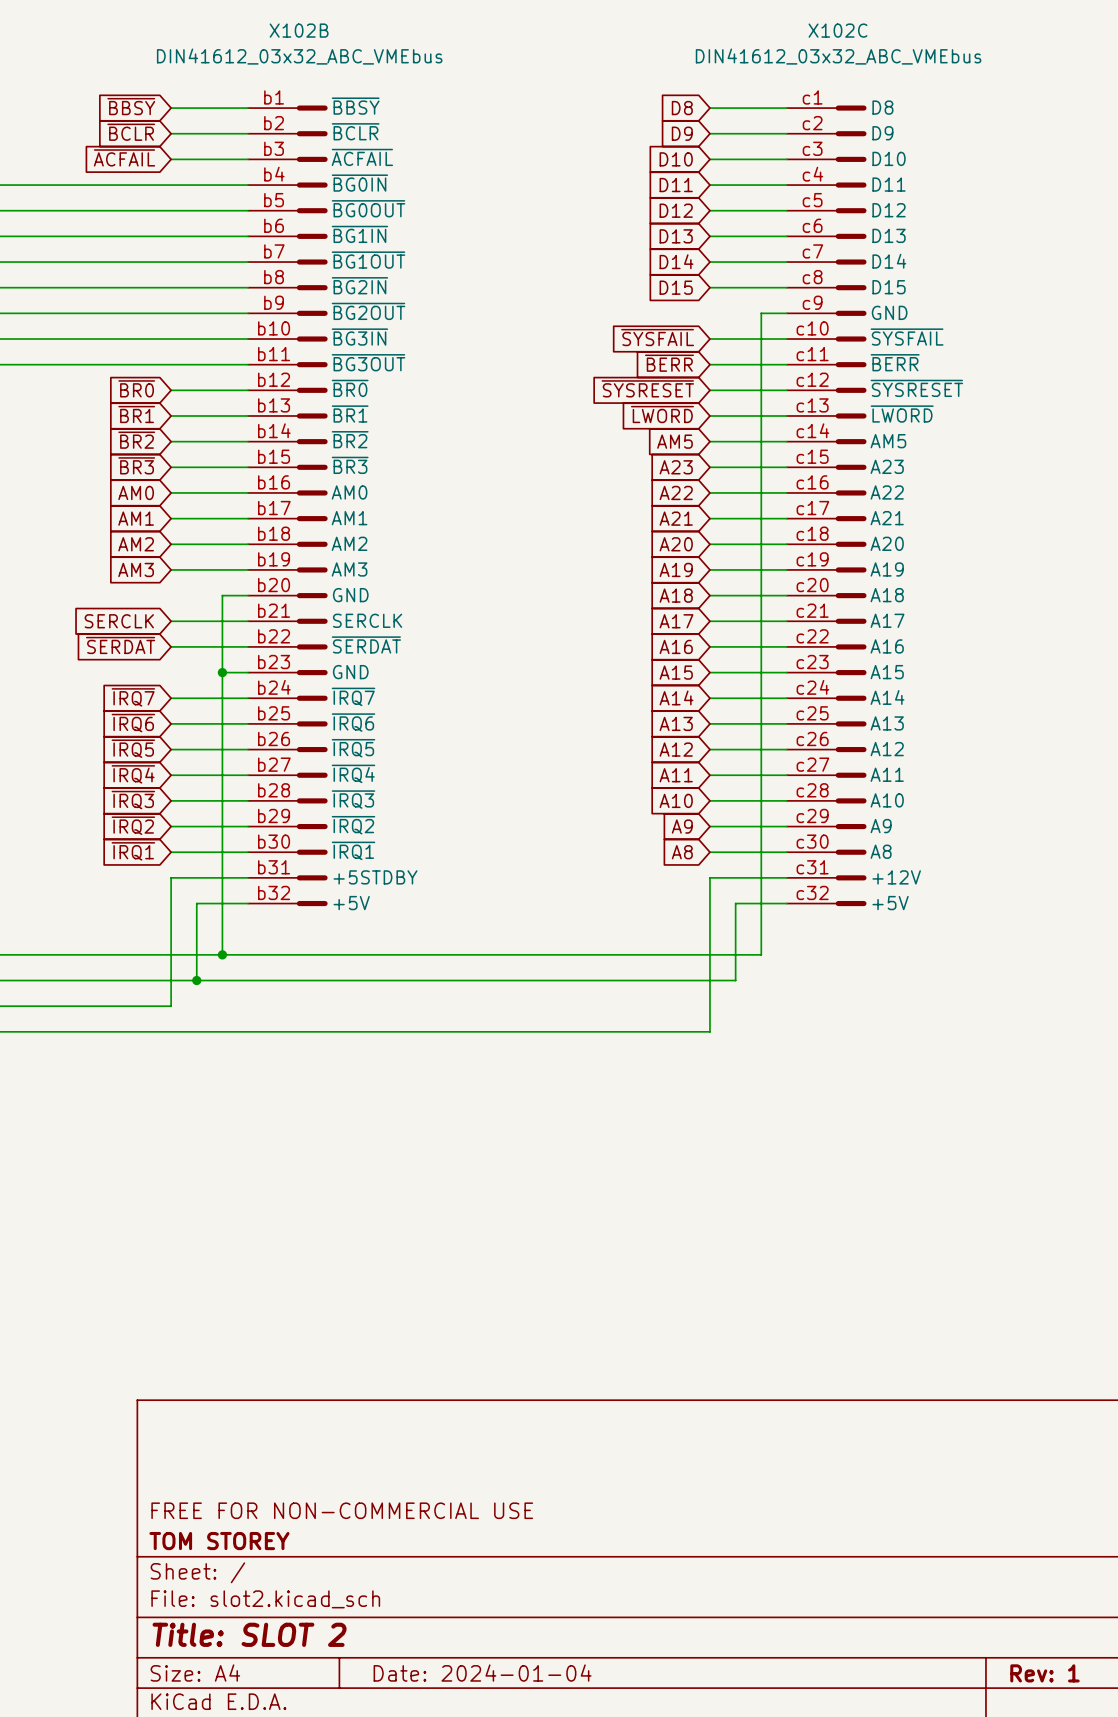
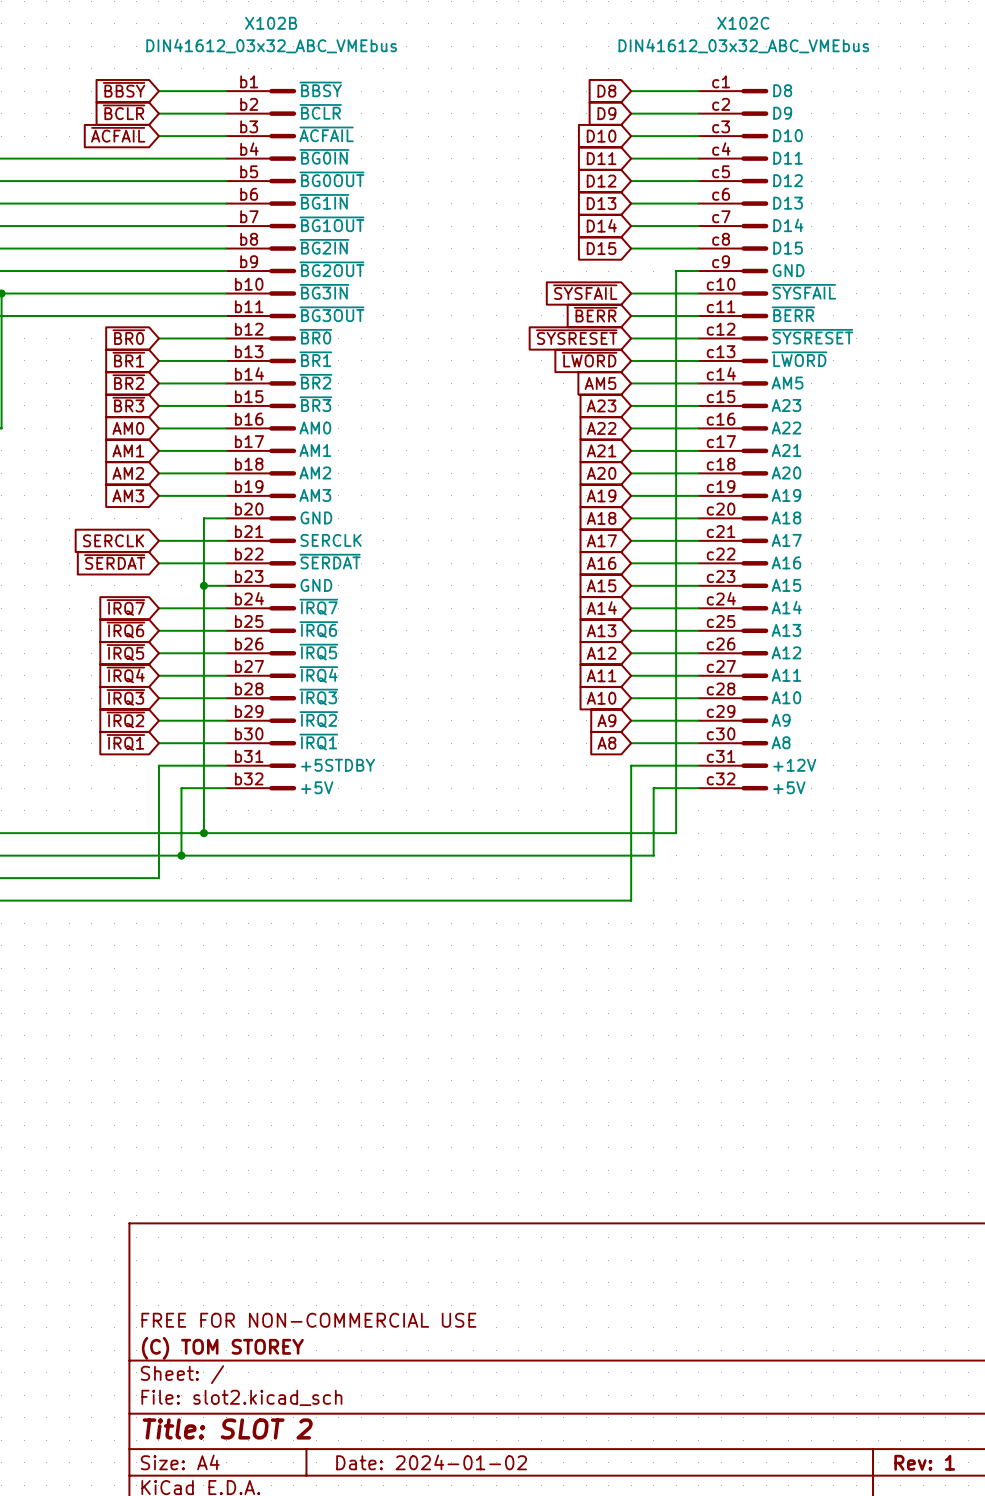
title block: TOM STOREY (219, 1541) -> (C) TOM STOREY (222, 1348)
title block: Date: 2024-01-04 (482, 1673) -> Date: 2024-01-02 (431, 1462)

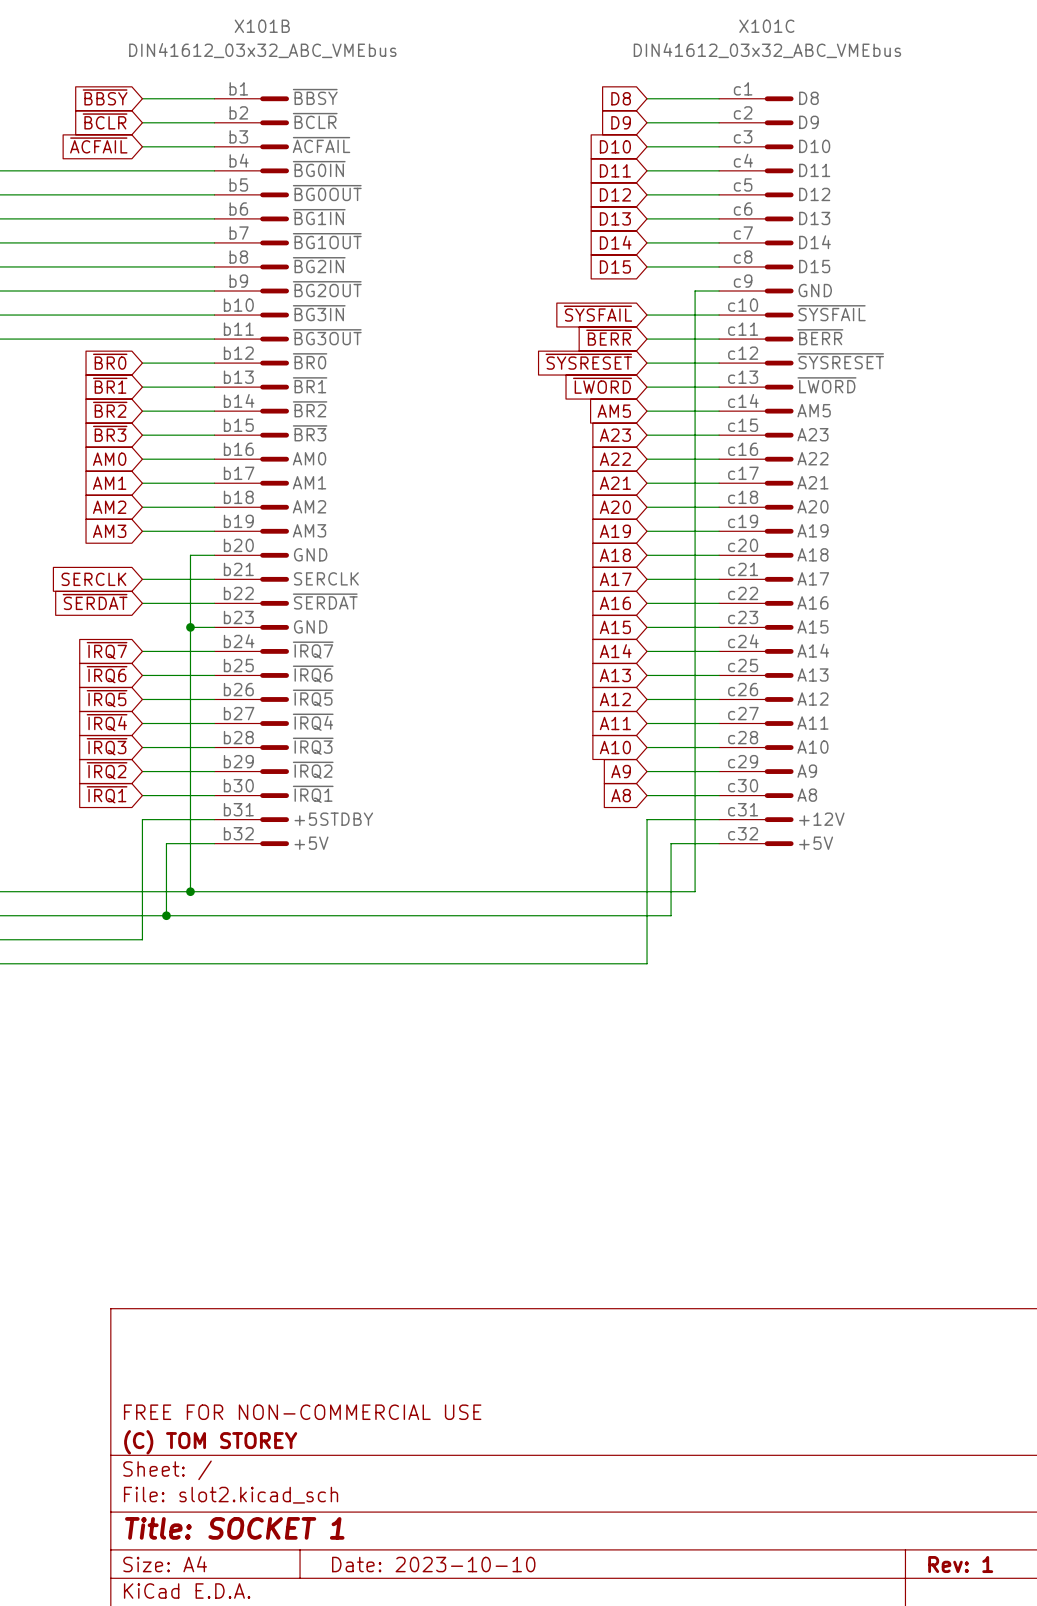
X102B name: X102B (271, 23) -> X101B (262, 26)
X102C name: X102C (743, 23) -> X101C (766, 26)
title block: Title: SLOT 2 (227, 1428) -> Title: SOCKET 1 (234, 1528)
title block: Date: 2024-01-02 (431, 1462) -> Date: 2023-10-10 (433, 1564)

